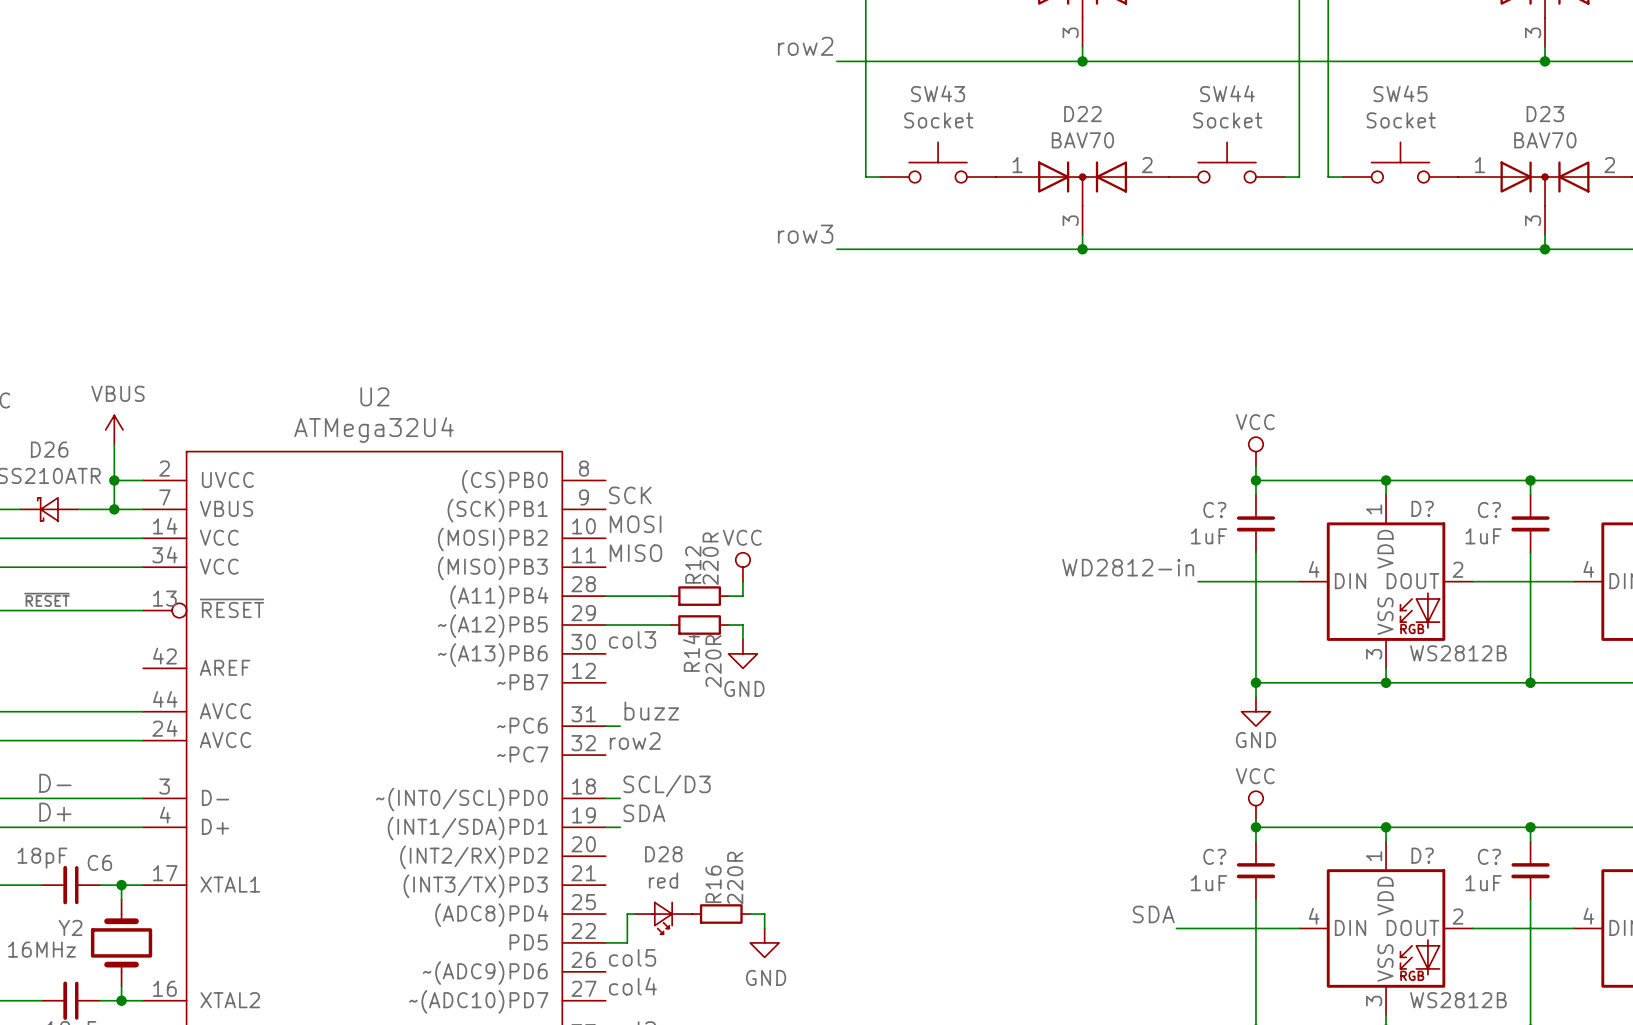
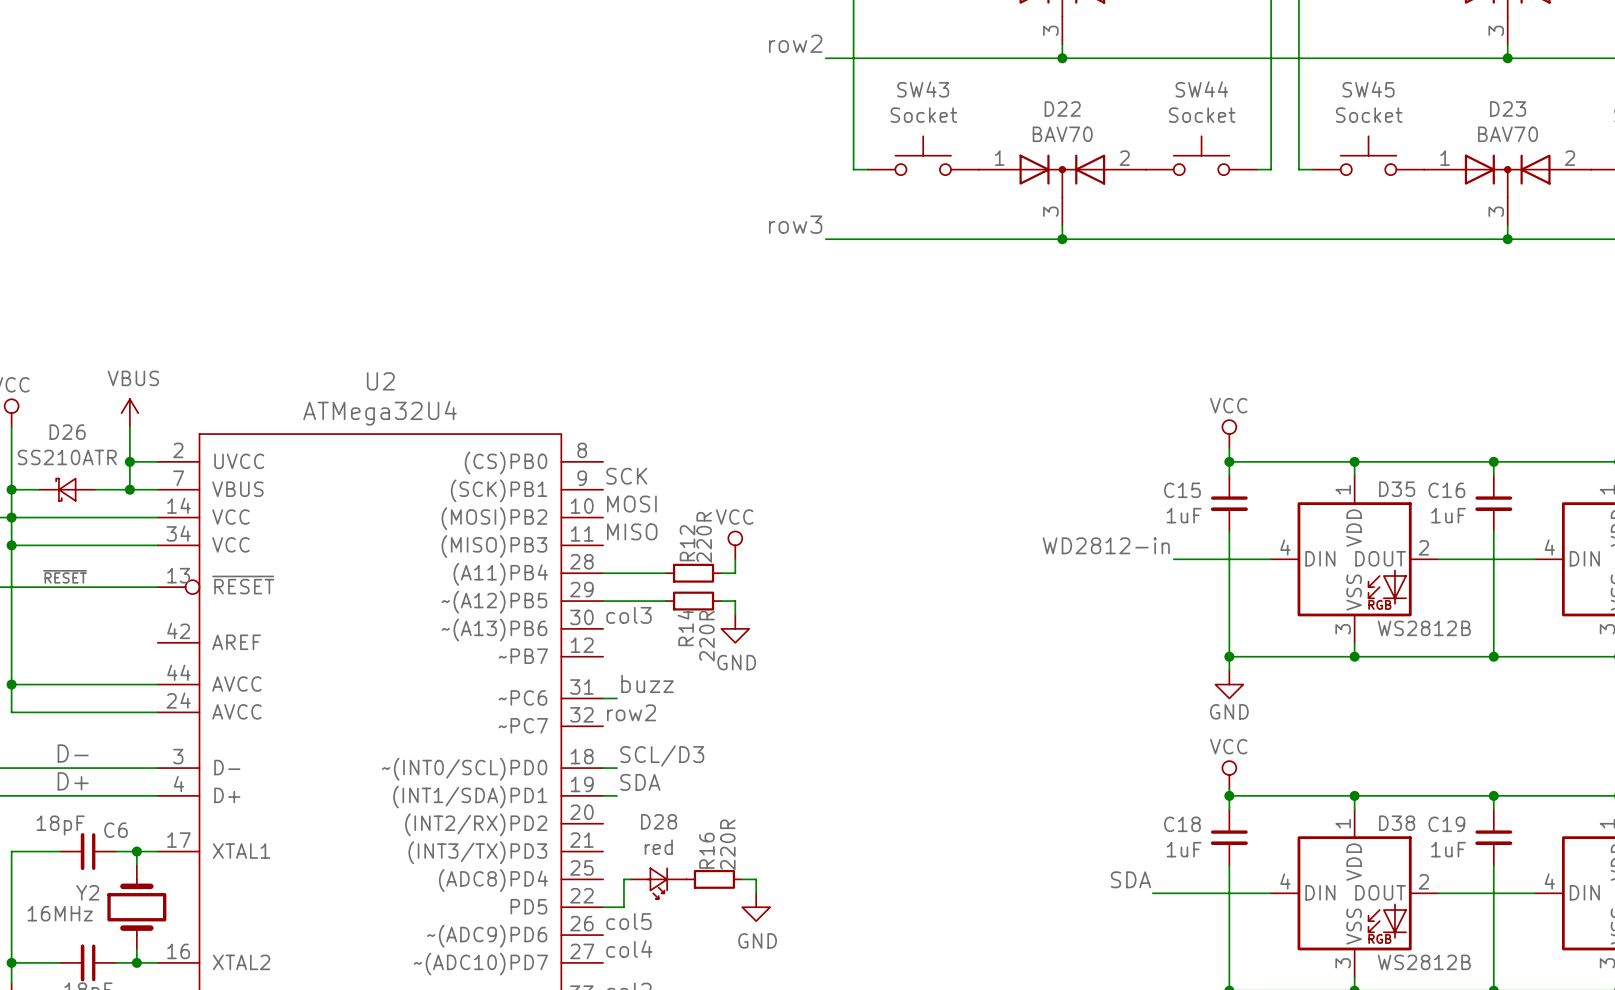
D? name: D? (1422, 508) -> D35 (1397, 489)
C? name: C? (1214, 510) -> C15 (1182, 490)
C? name: C? (1489, 510) -> C16 (1446, 490)
D? name: D? (1422, 855) -> D38 (1397, 823)
C? name: C? (1214, 856) -> C18 (1182, 824)
C? name: C? (1489, 856) -> C19 (1446, 824)

